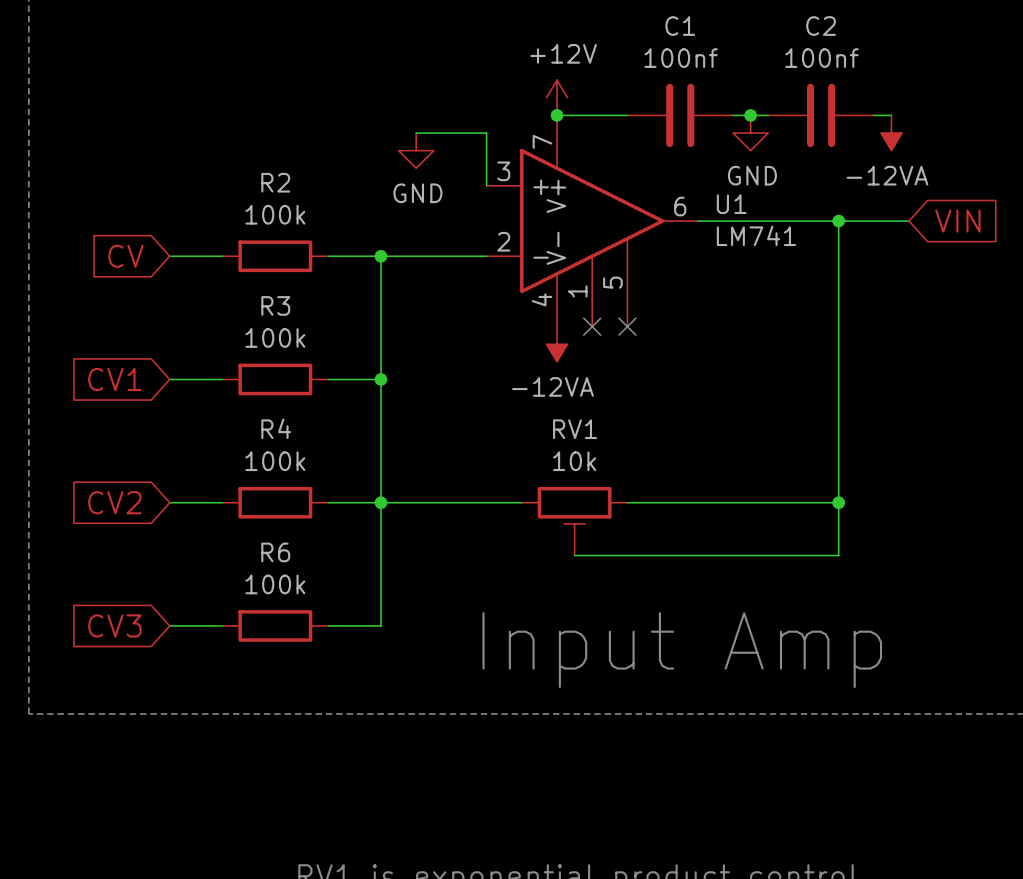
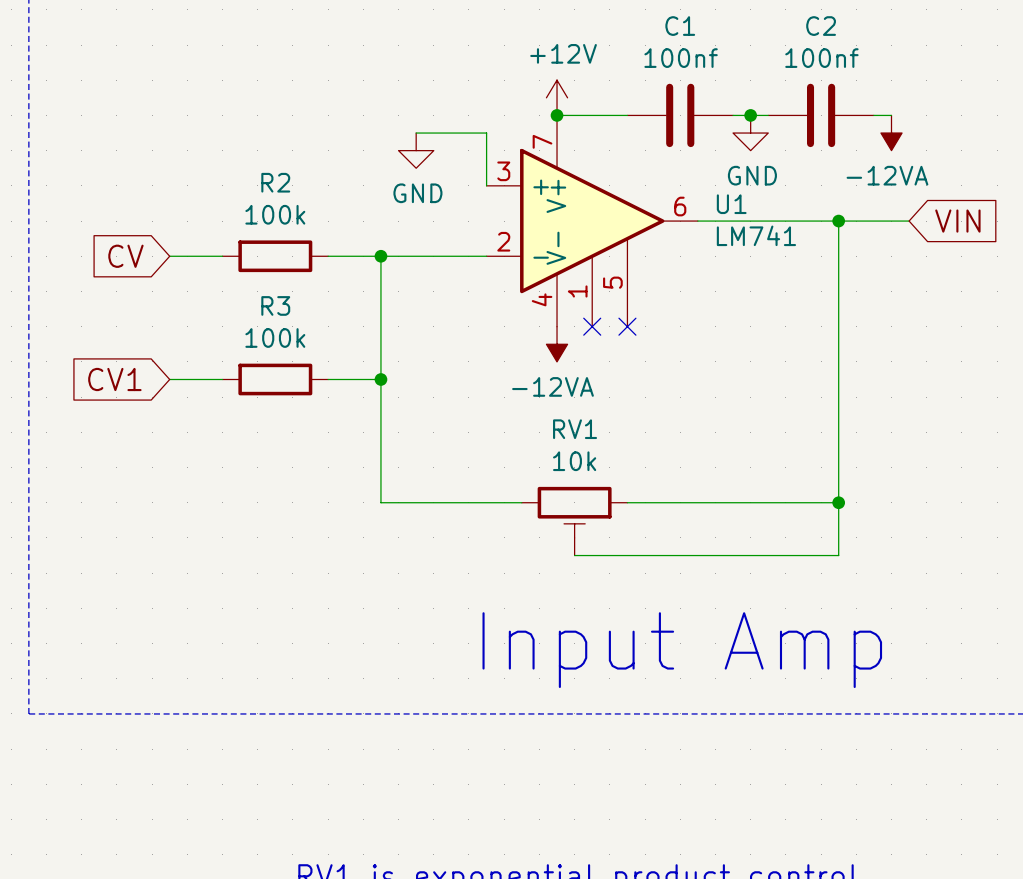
global label: CV2 (114, 502) -> none
wire: (169, 502) (222, 502) -> none
R4: 100k (275, 502) -> none
wire: (328, 502) (380, 502) (380, 625) (328, 625) -> none
junction: (380, 502) -> none
global label: CV3 (114, 625) -> none
wire: (169, 625) (222, 625) -> none
R6: 100k (275, 625) -> none

